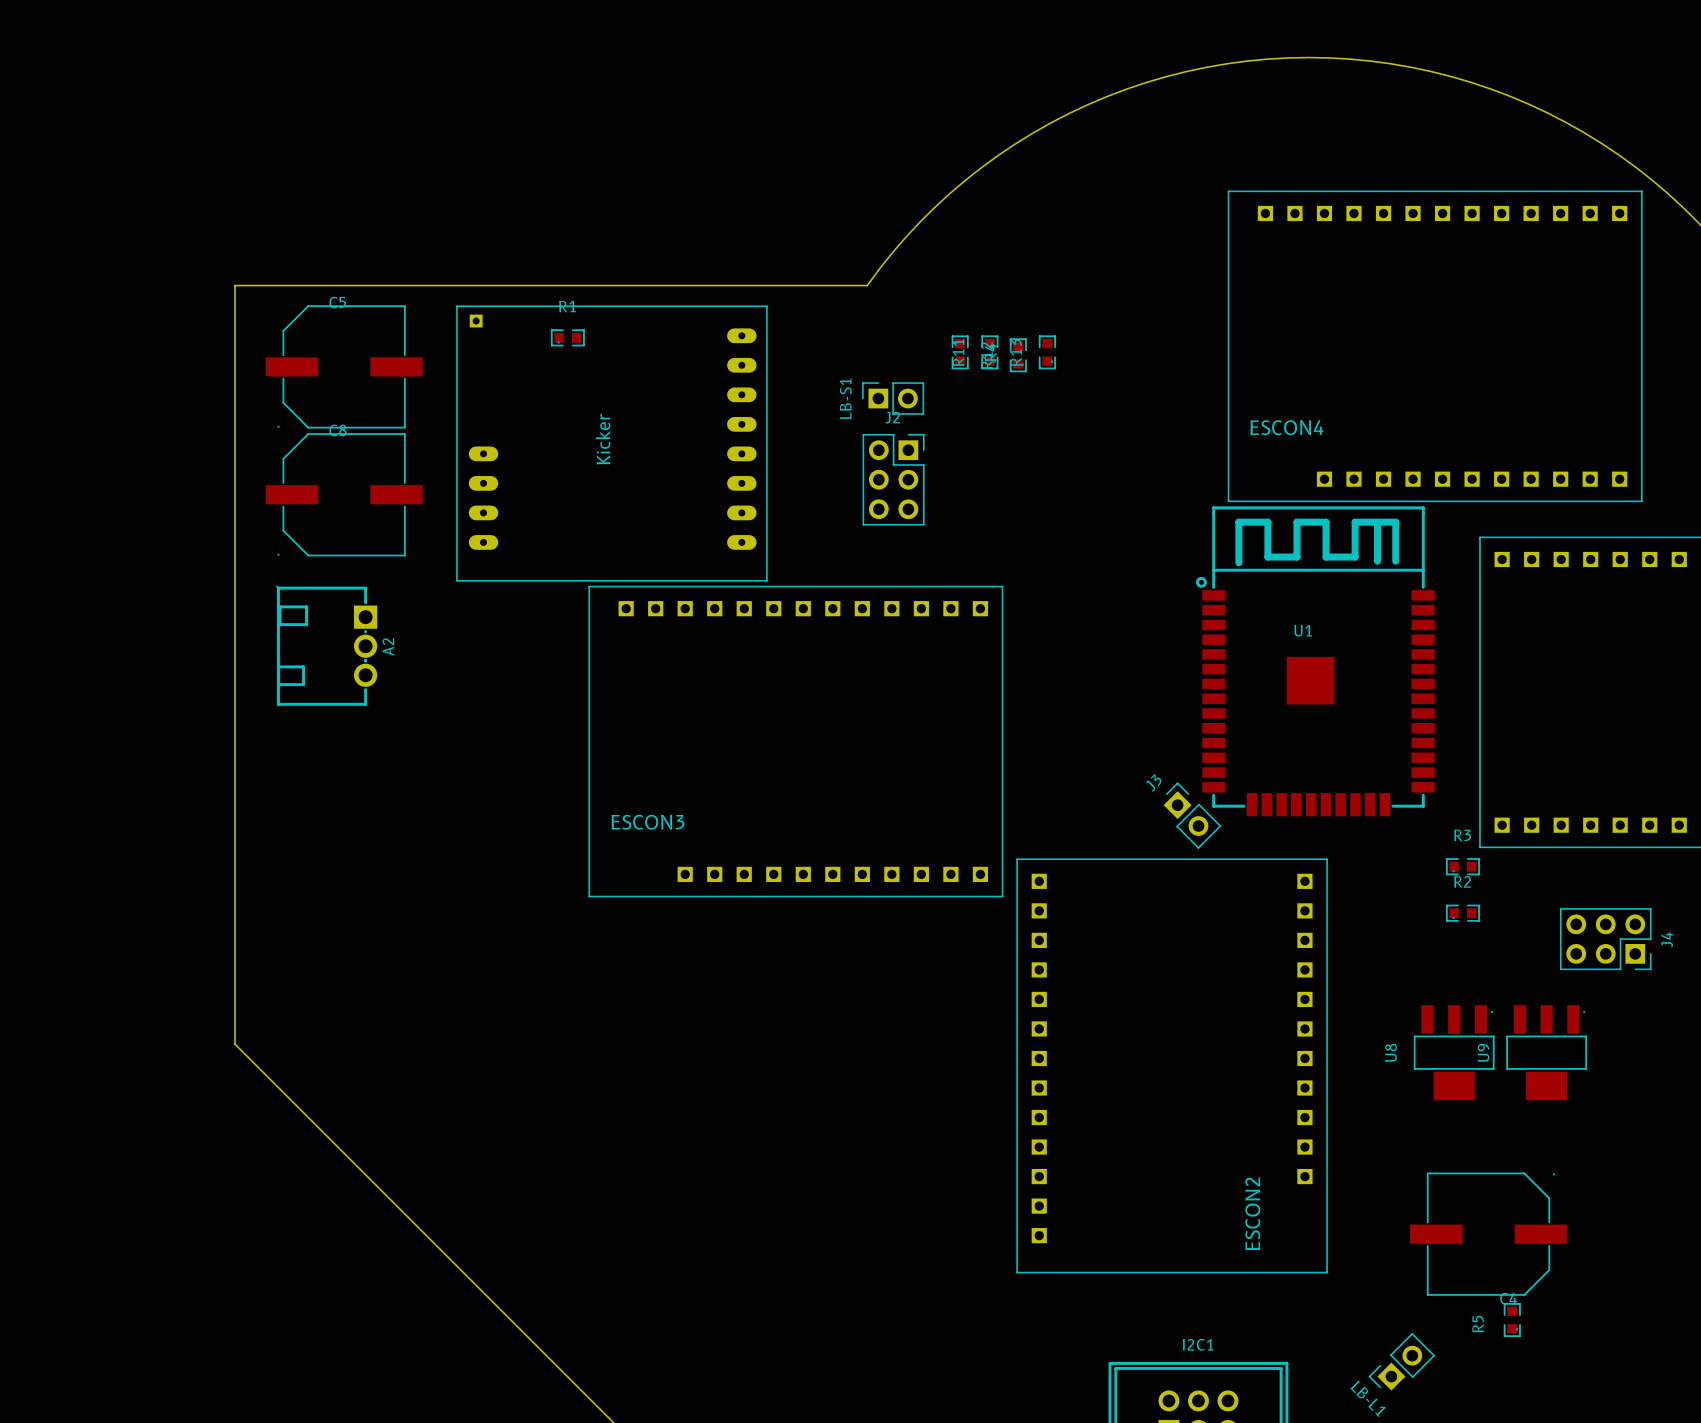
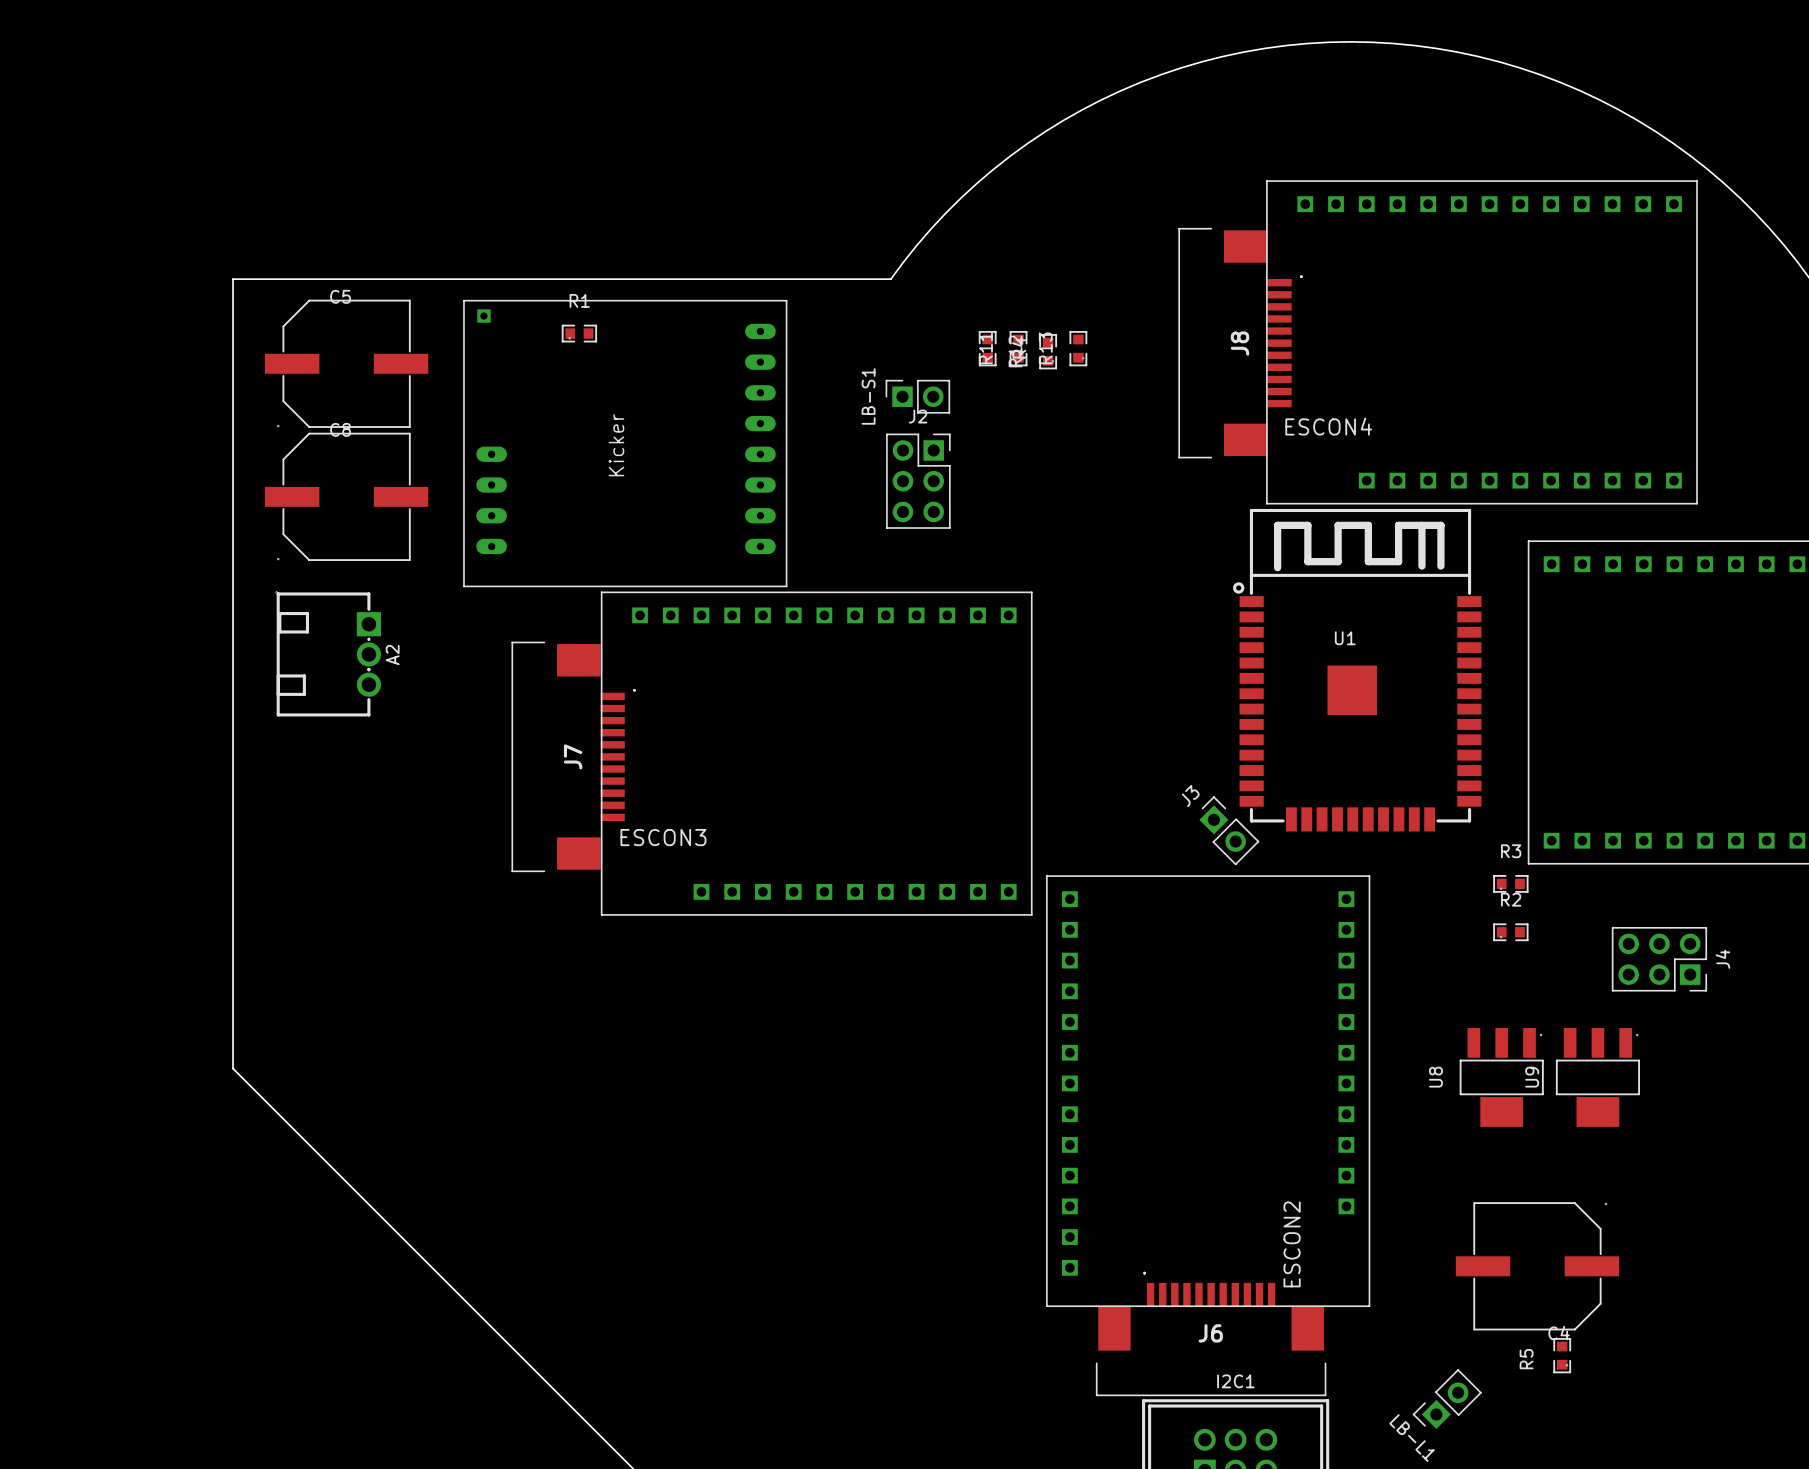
J8: none -> (1240, 343)
J7: none -> (573, 756)
J6: none -> (1211, 1333)

